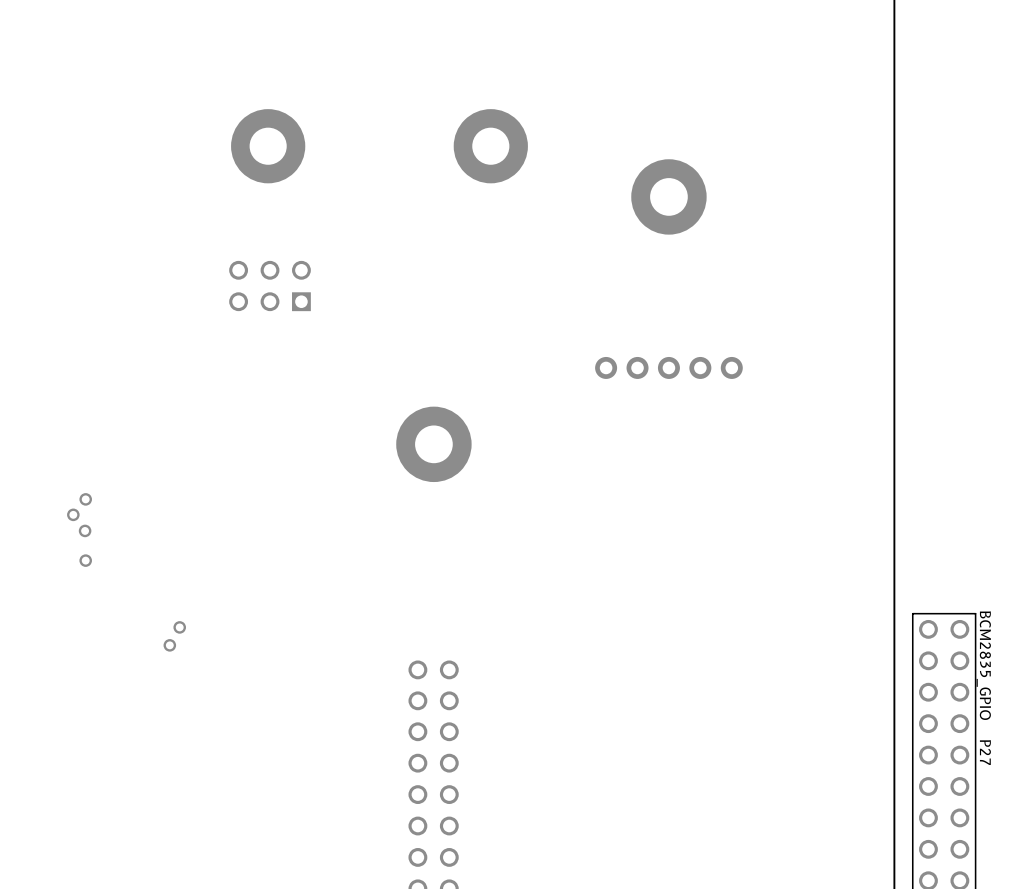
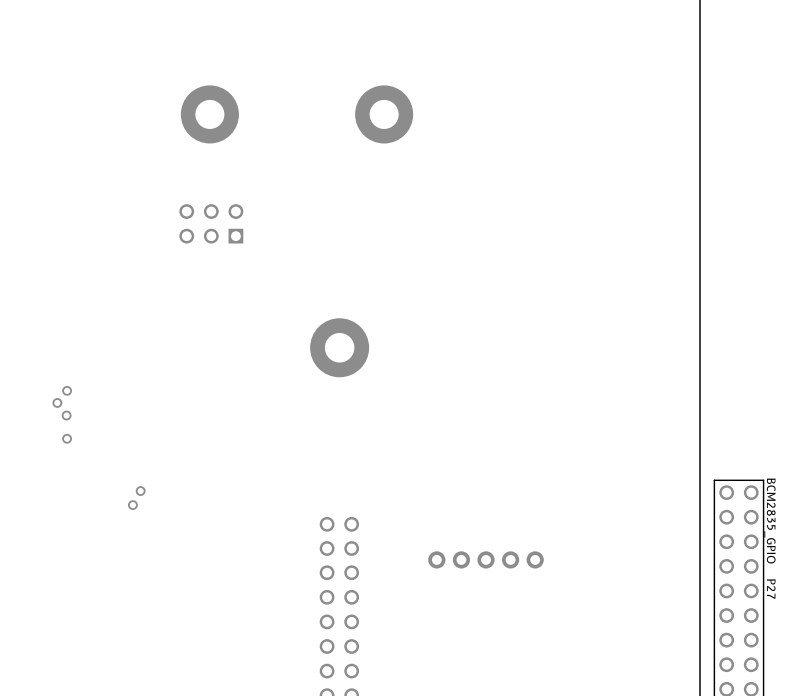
part: (668, 196) -> none
part: (668, 367) -> none
part: none -> (486, 559)

